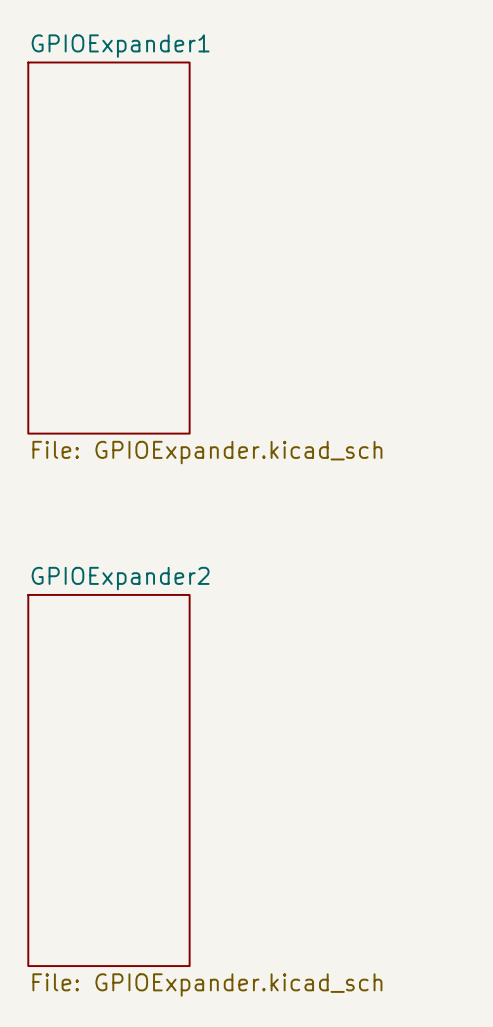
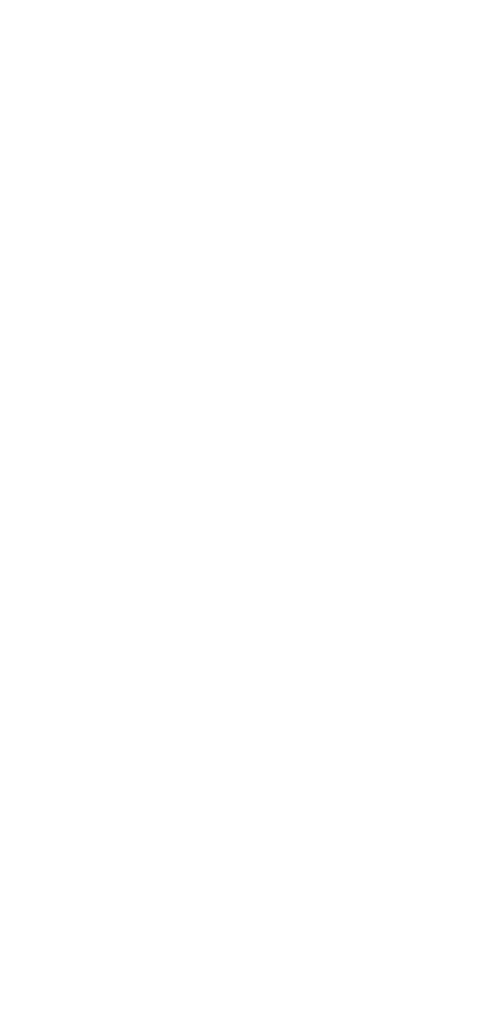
sheet GPIOExpander1: File: GPIOExpander.kicad_sch (108, 248) -> none
sheet GPIOExpander2: File: GPIOExpander.kicad_sch (108, 780) -> none

